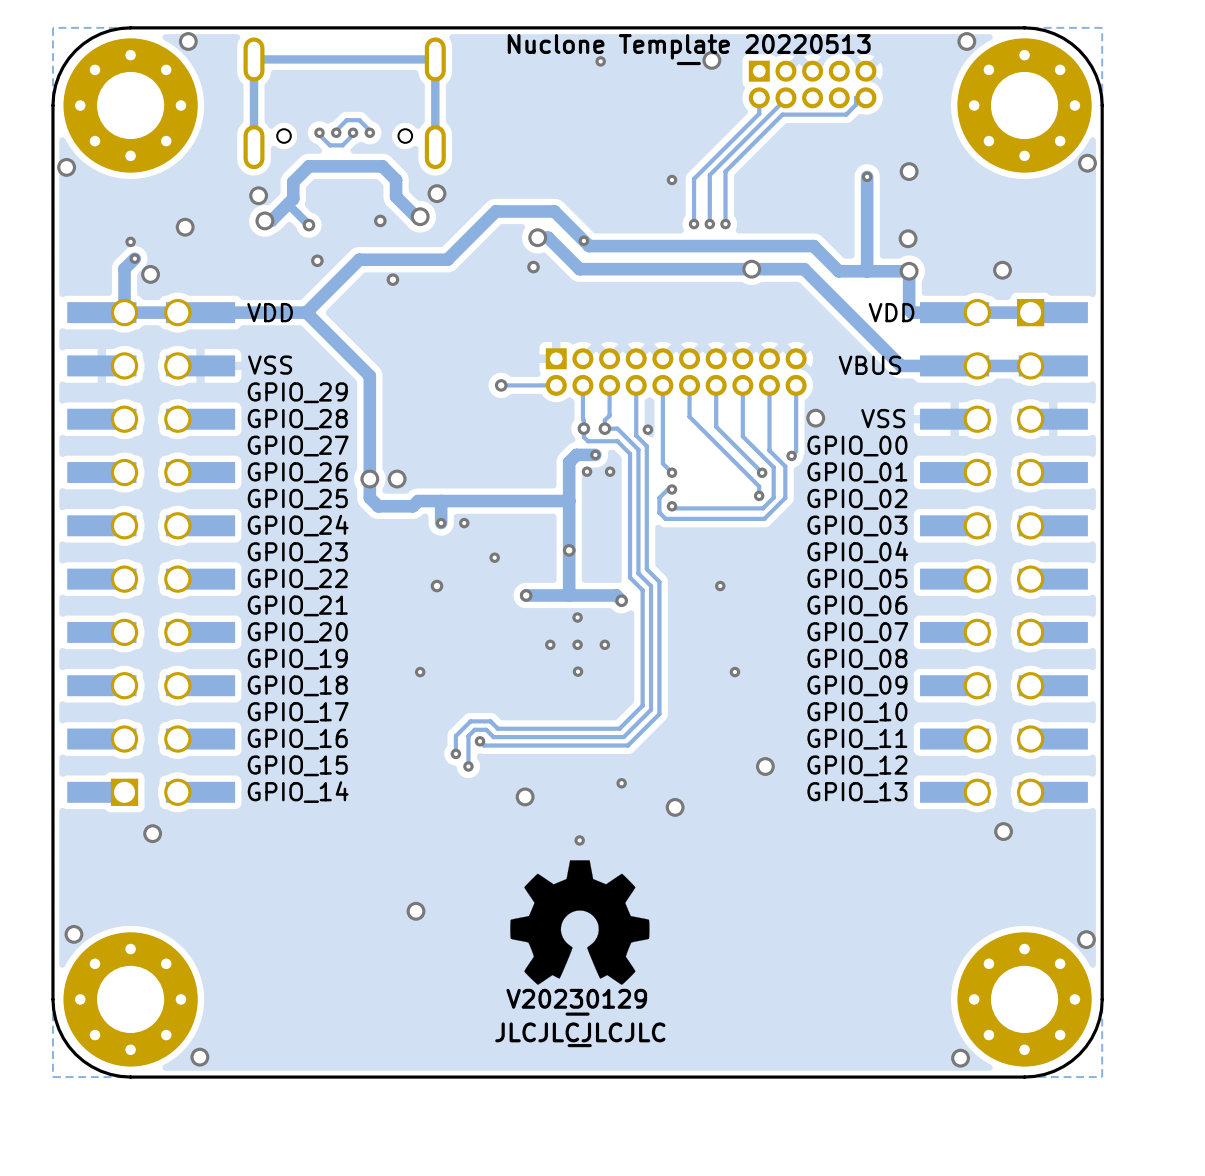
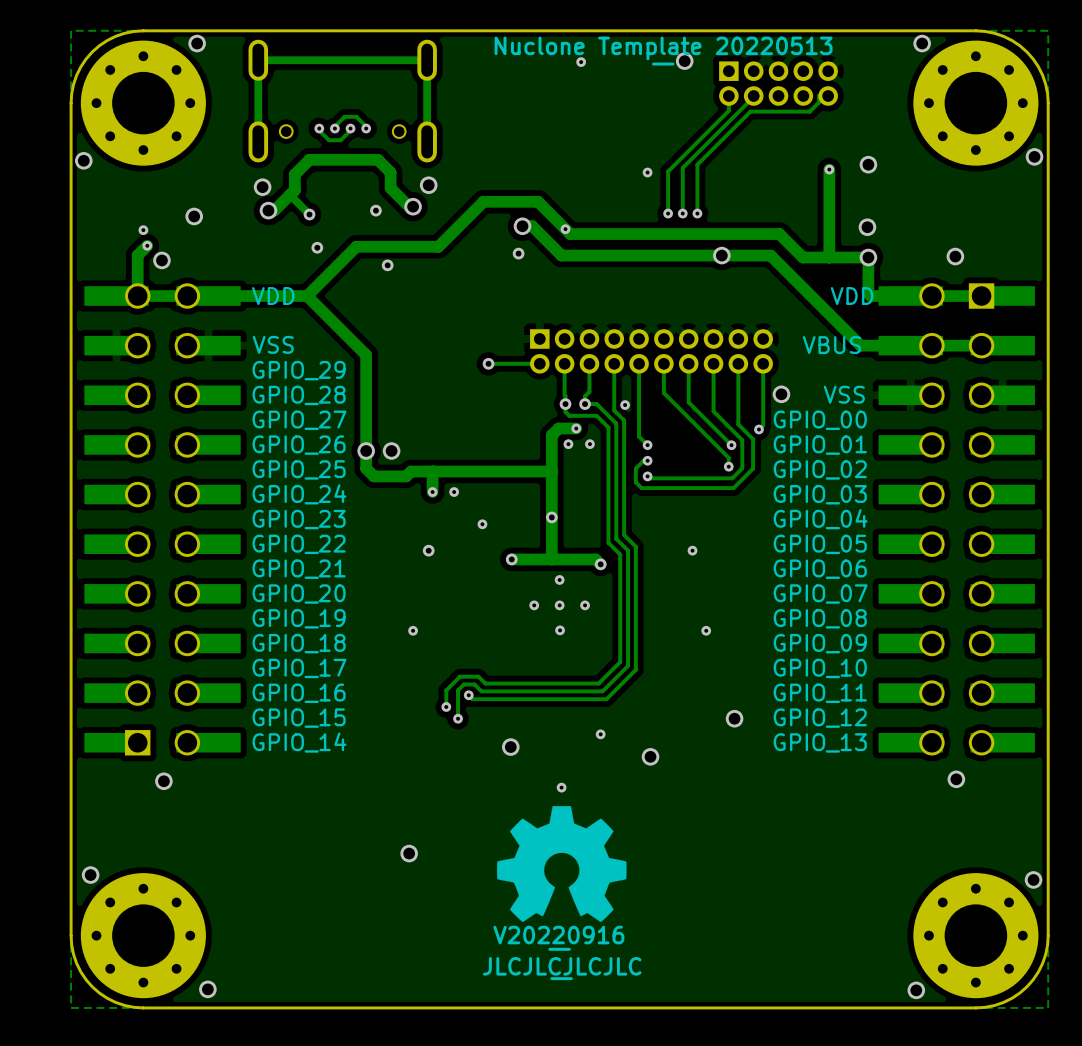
drawing shape: [506, 988, 648, 1016] -> [493, 925, 625, 951]

